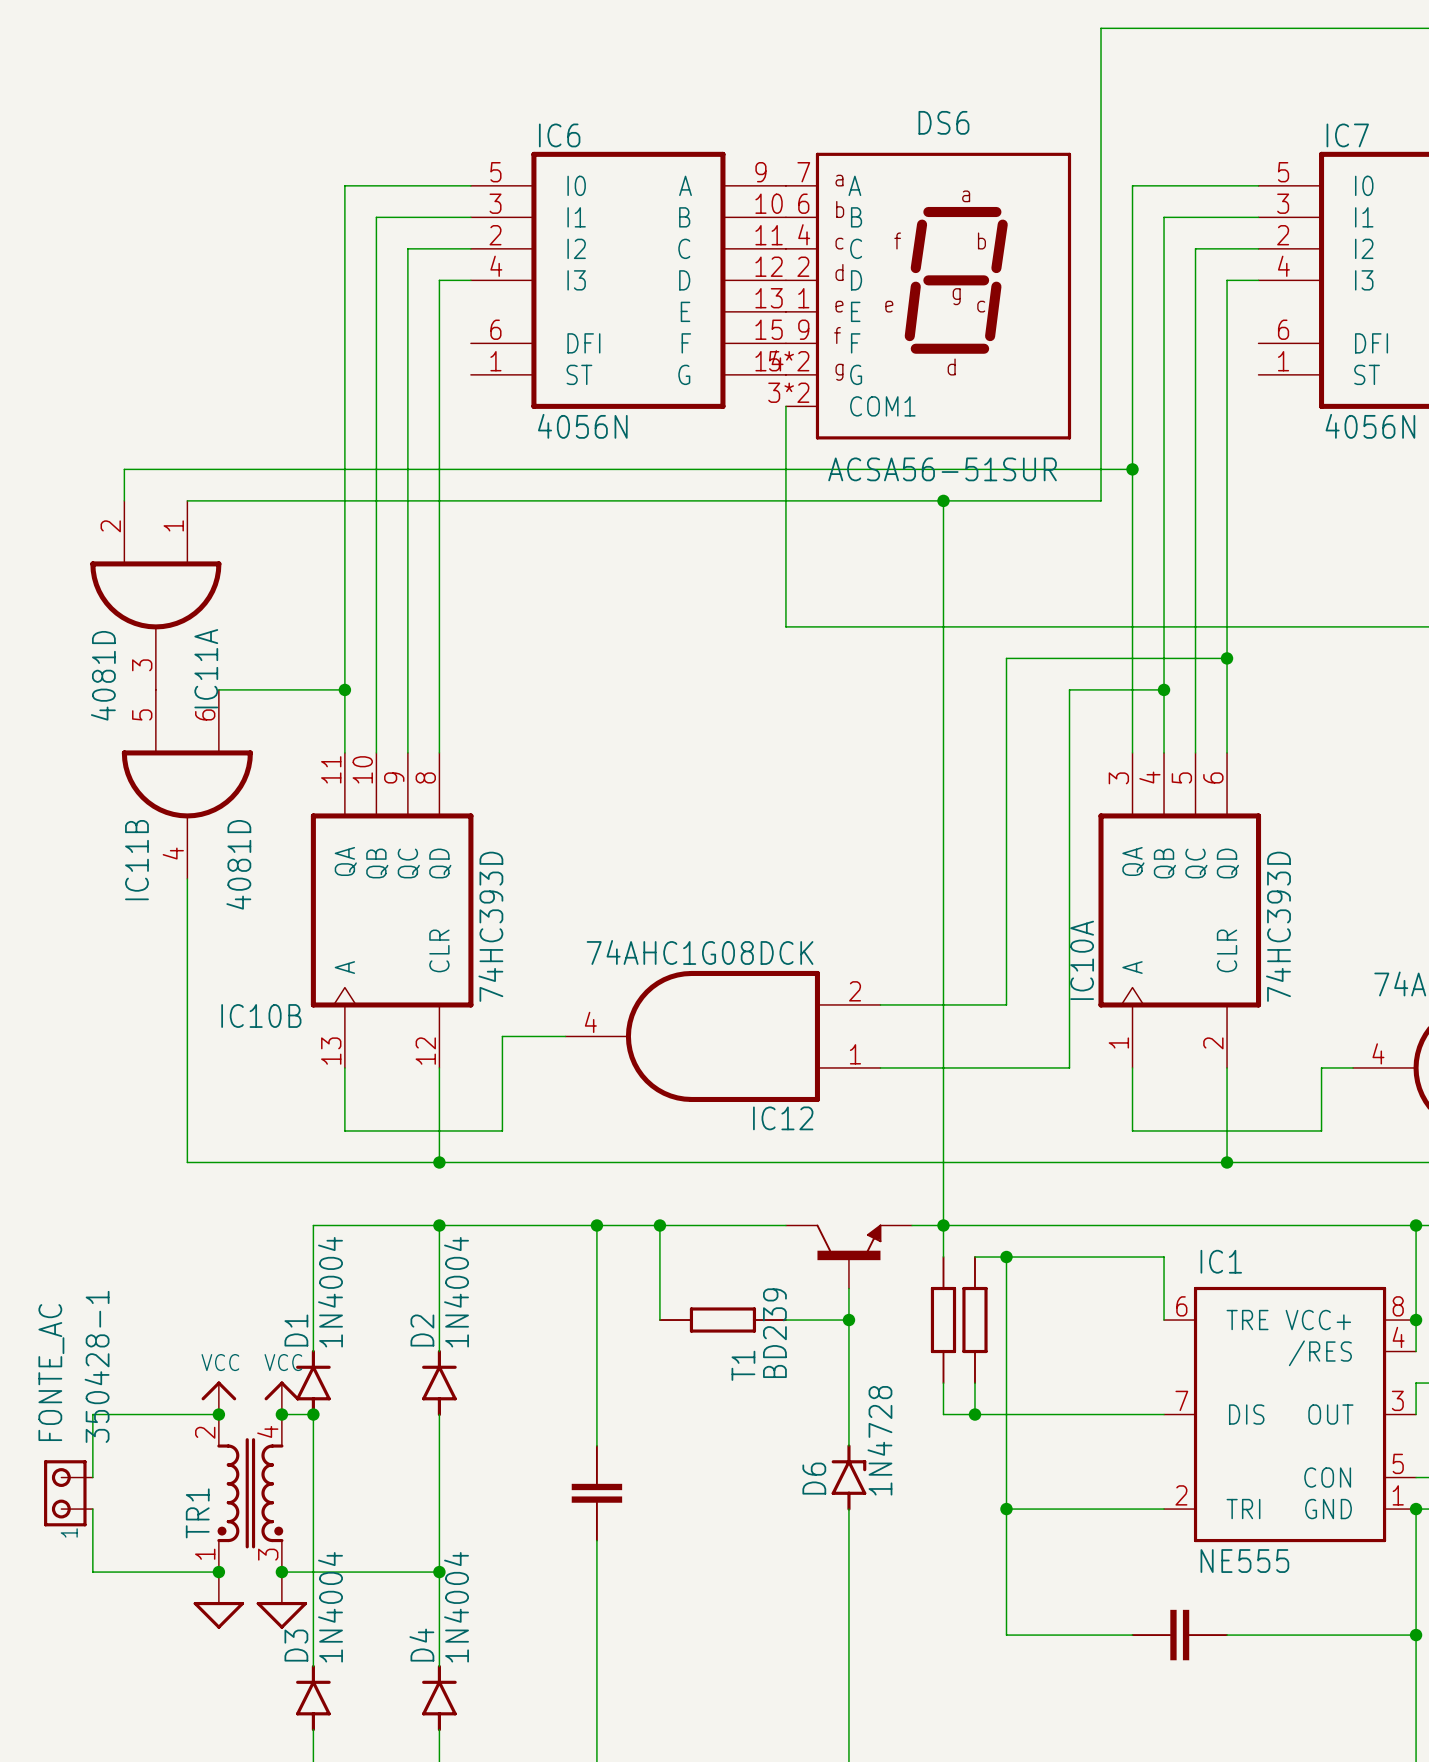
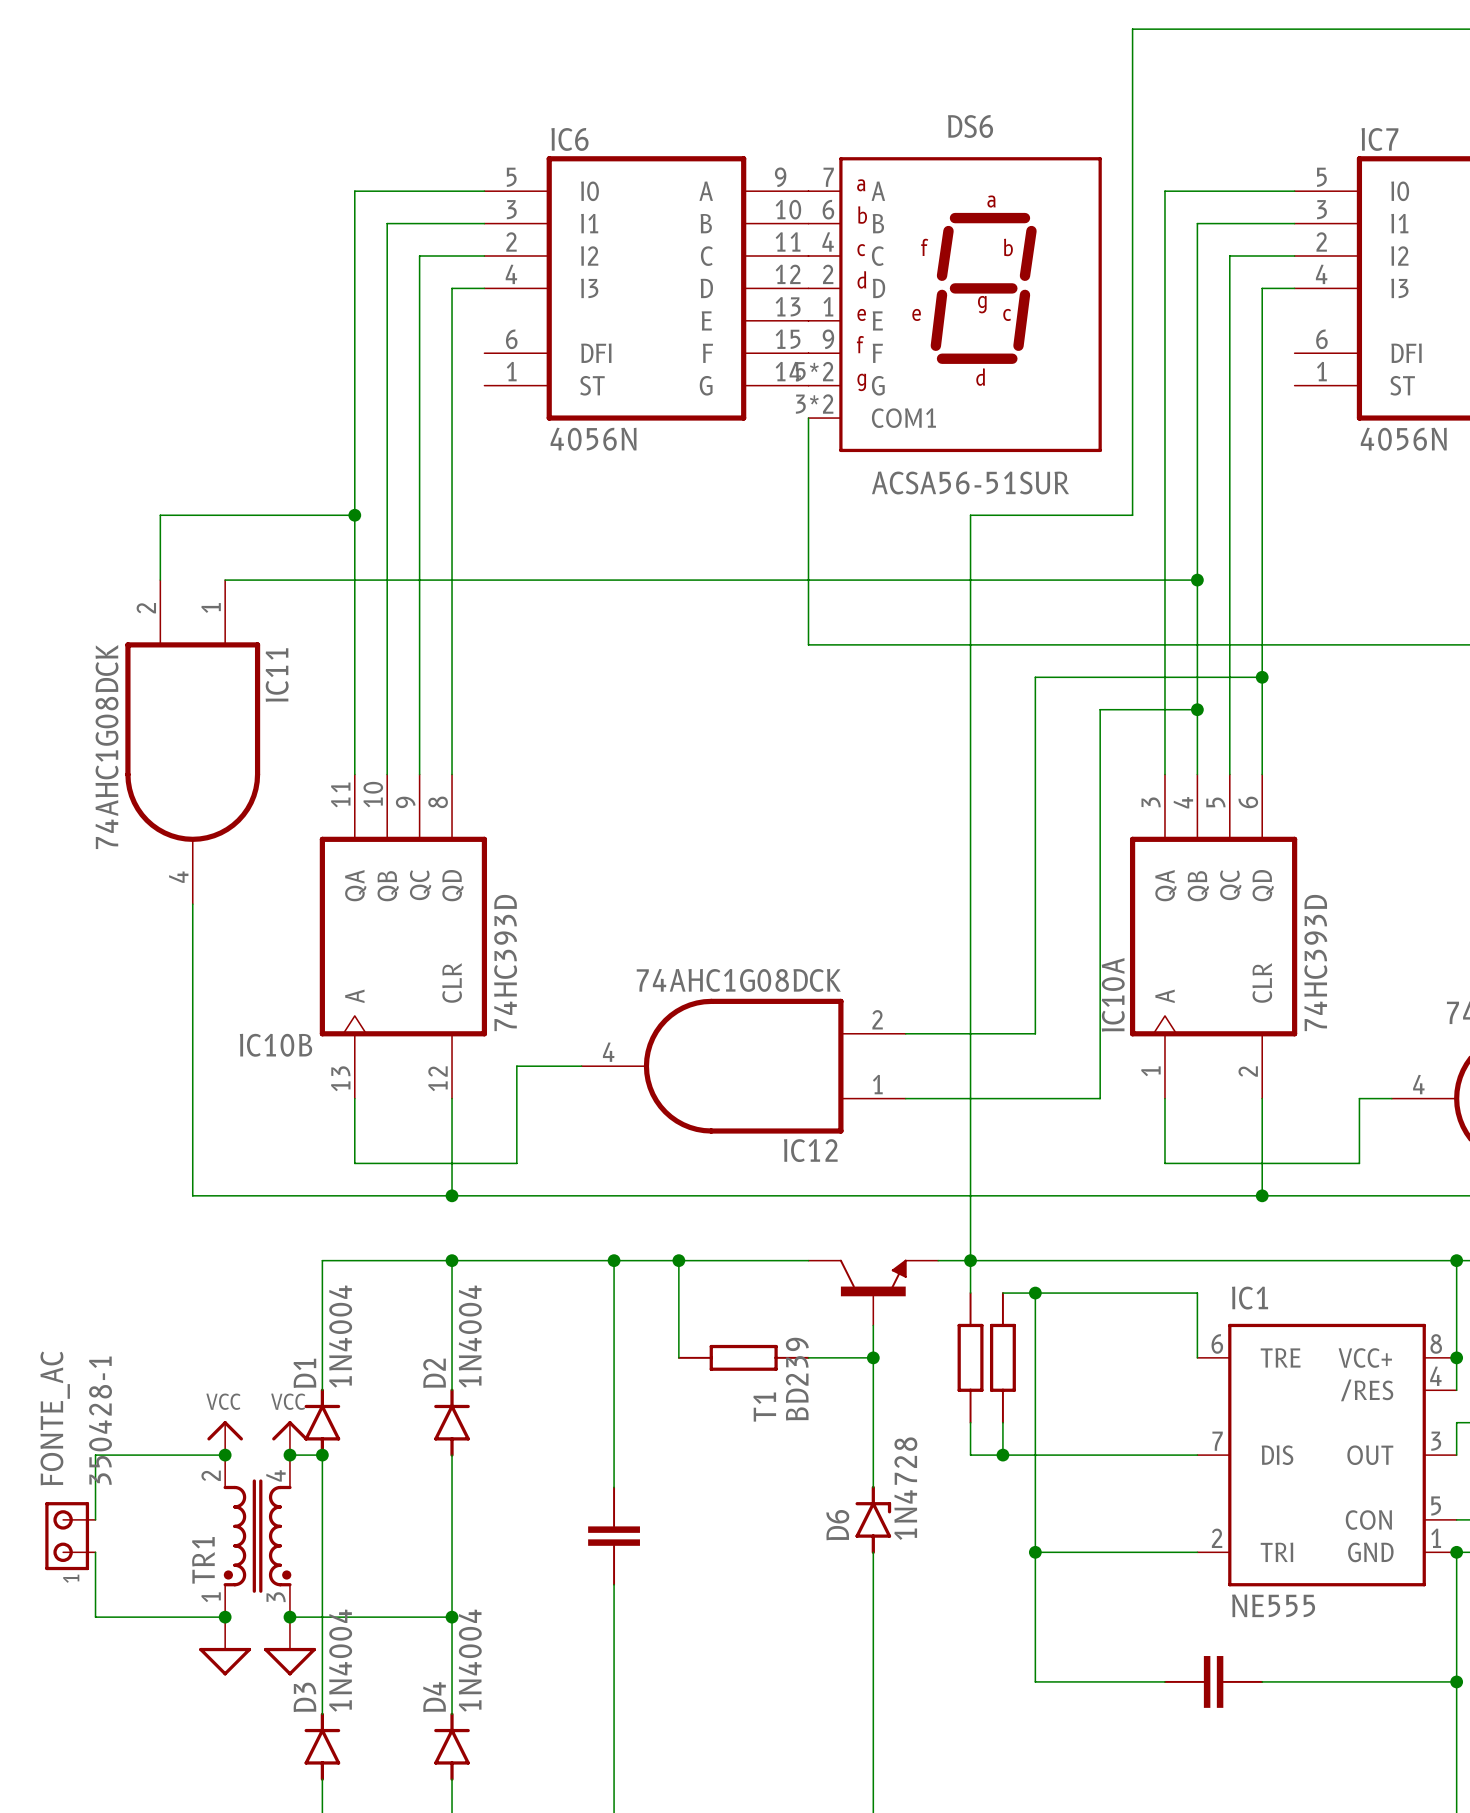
wire: (1132, 469) (124, 469) (124, 500) -> none
junction: (1132, 469) -> none
wire: none -> (192, 515) (160, 515) (160, 580)
wire: (344, 500) (943, 500) -> none
junction: none -> (354, 515)
junction: (943, 500) -> none
wire: none -> (225, 580) (1197, 580)
junction: none -> (1197, 580)
IC11A: 4081D (155, 595) -> none
wire: (218, 689) (344, 689) -> none
junction: (344, 689) -> none
IC11: none -> 74AHC1G08DCK (192, 742)
IC11B: 4081D (187, 784) -> none

